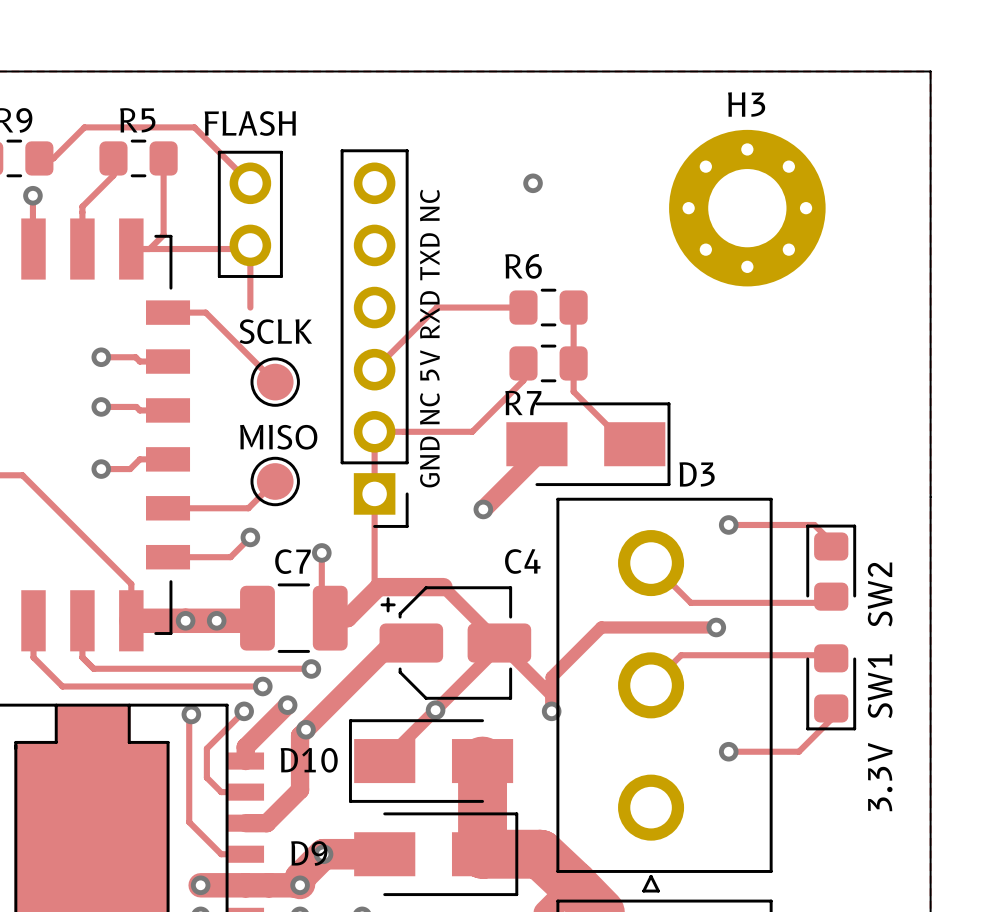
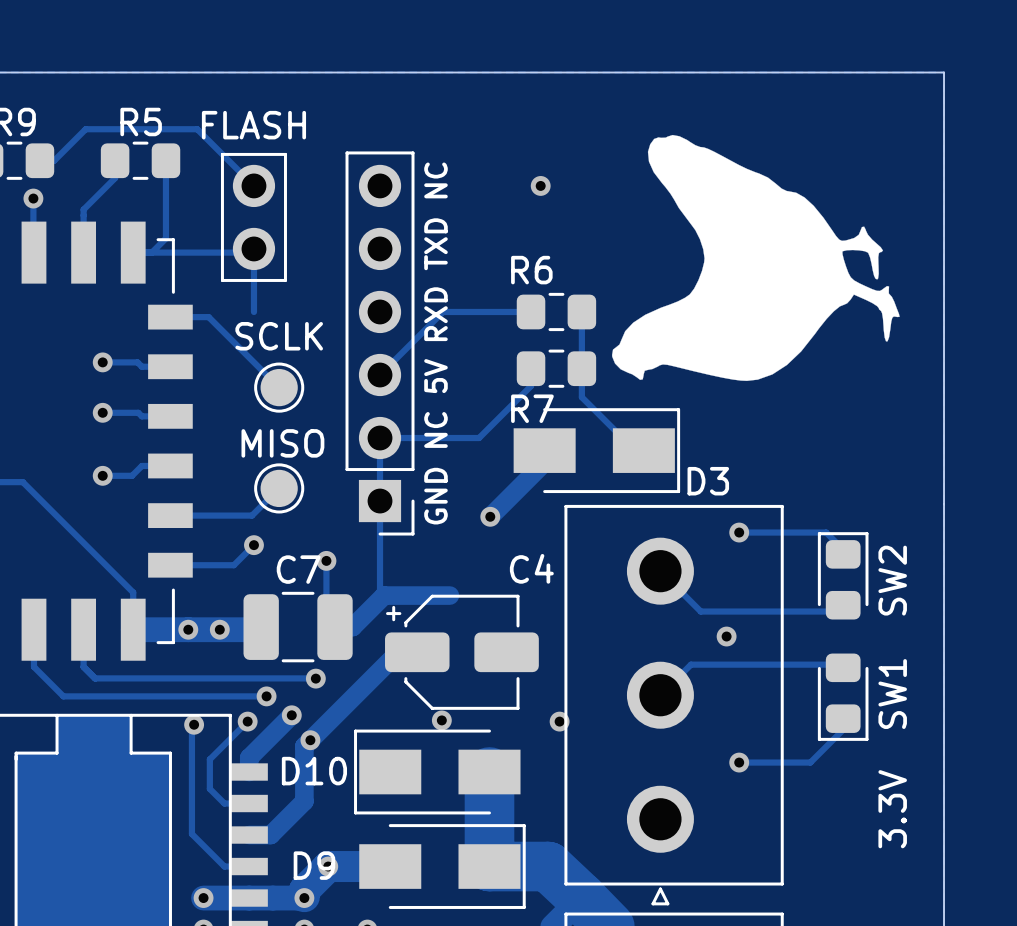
drawing: none -> [612, 134, 900, 381]
H3: (747, 208) -> none
track: (443, 587) (551, 695) -> none
track: (716, 627) (601, 627) (551, 677) (551, 711) -> none
track: (499, 646) (384, 761) -> none

